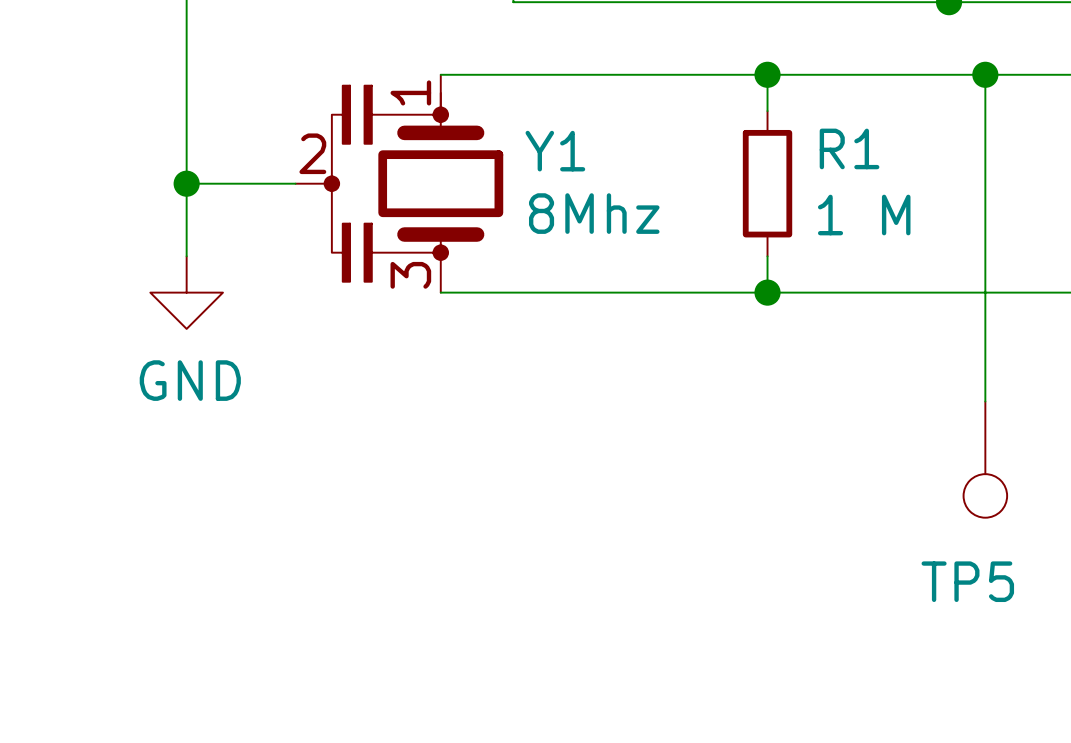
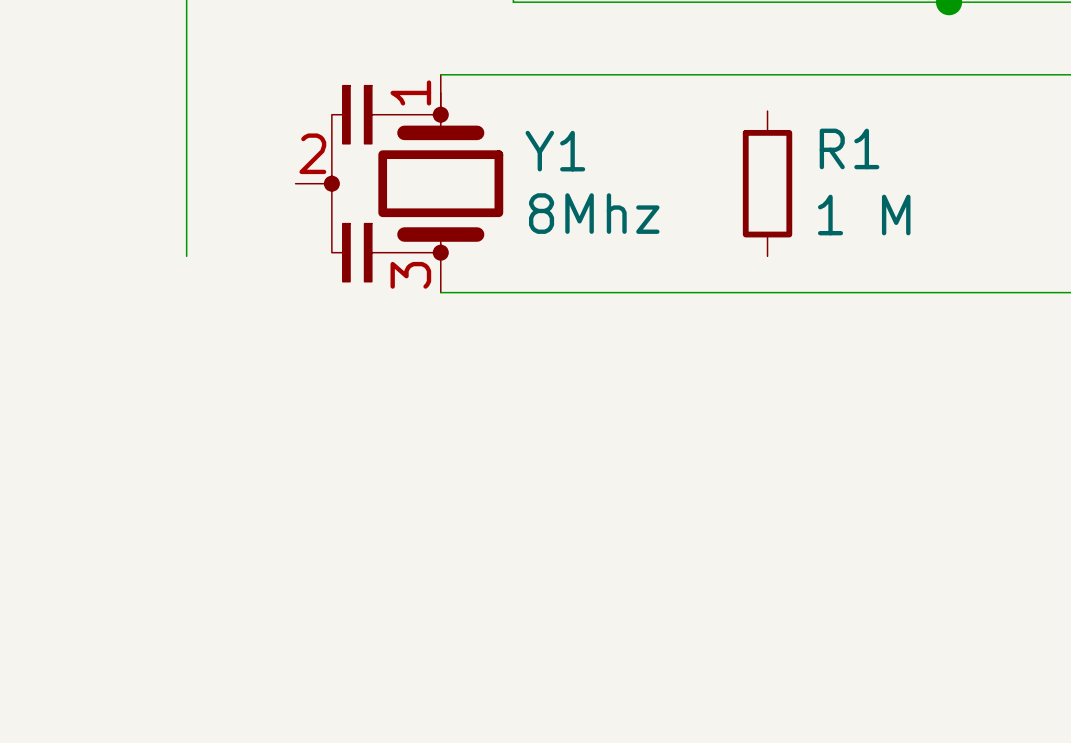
wire: (767, 74) (767, 111) -> none
junction: (767, 74) -> none
wire: (985, 74) (985, 401) -> none
junction: (985, 74) -> none
wire: (186, 183) (295, 183) -> none
junction: (186, 183) -> none
wire: (767, 256) (767, 292) -> none
power symbol: GND (186, 292) -> none
junction: (767, 292) -> none
TP5: (985, 459) -> none

